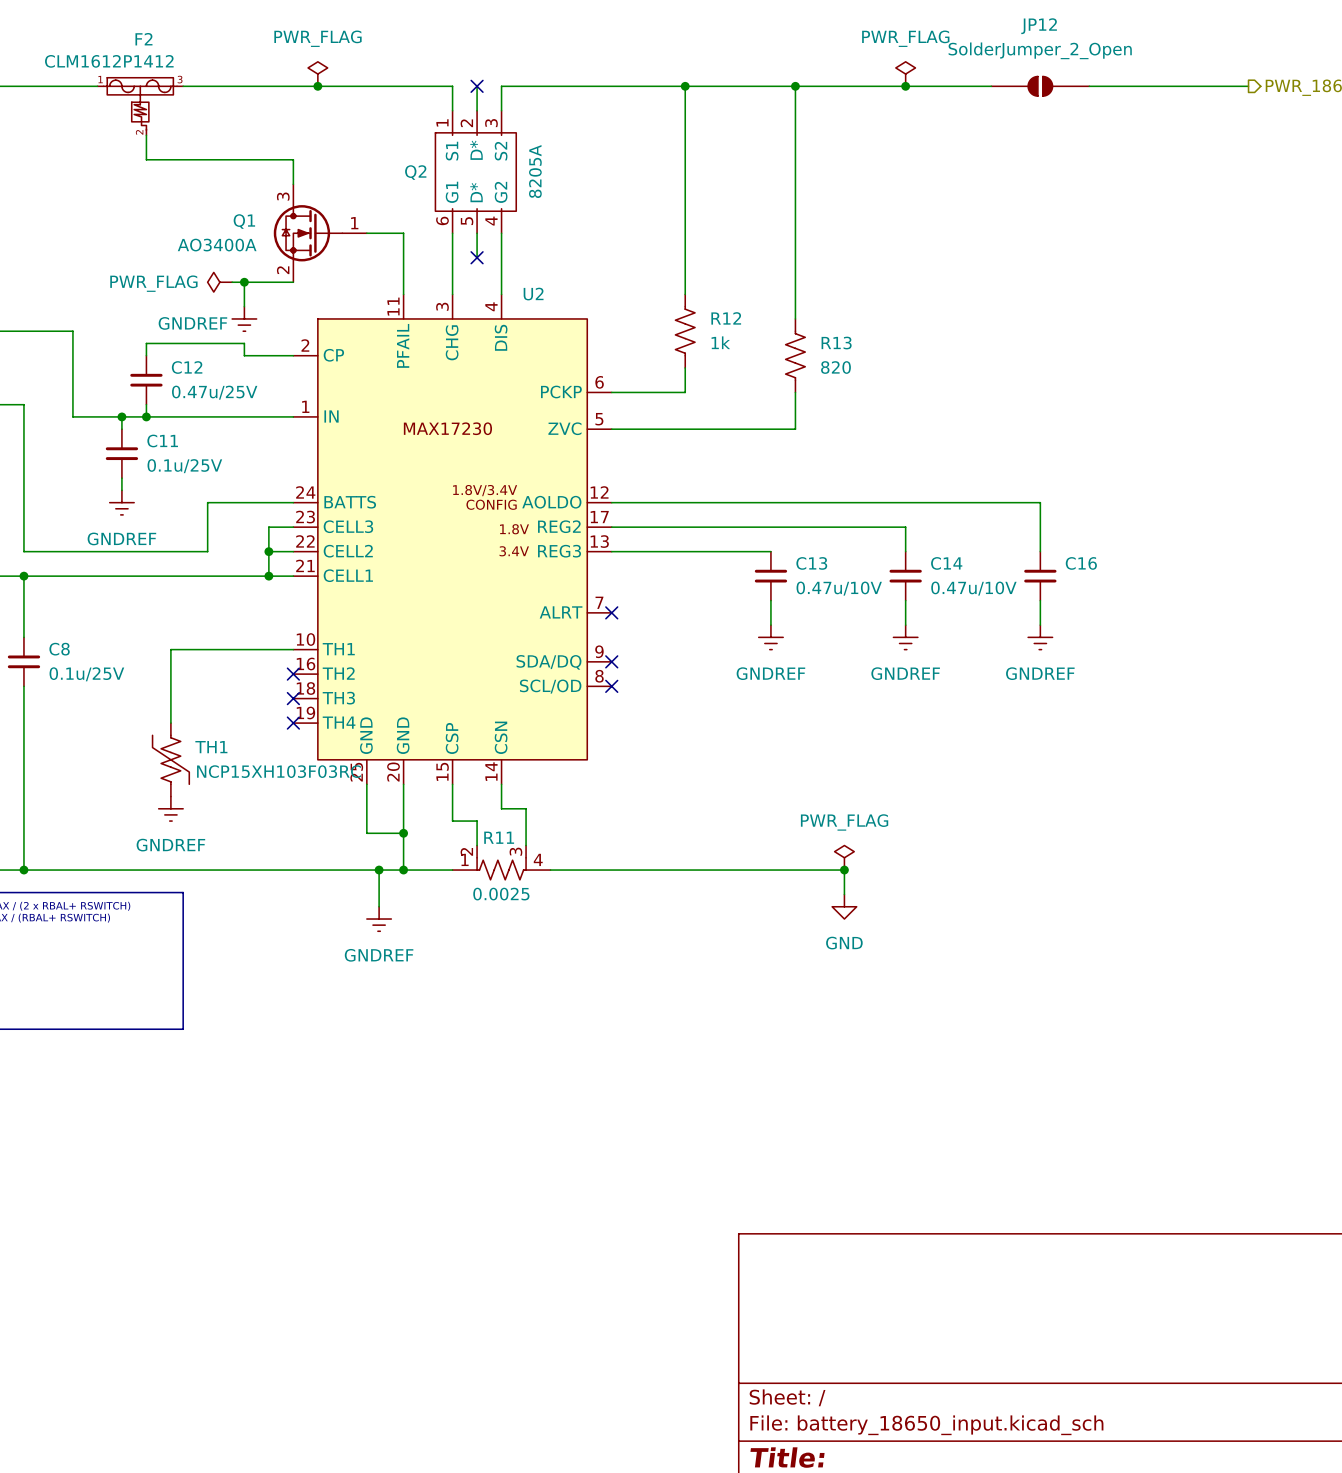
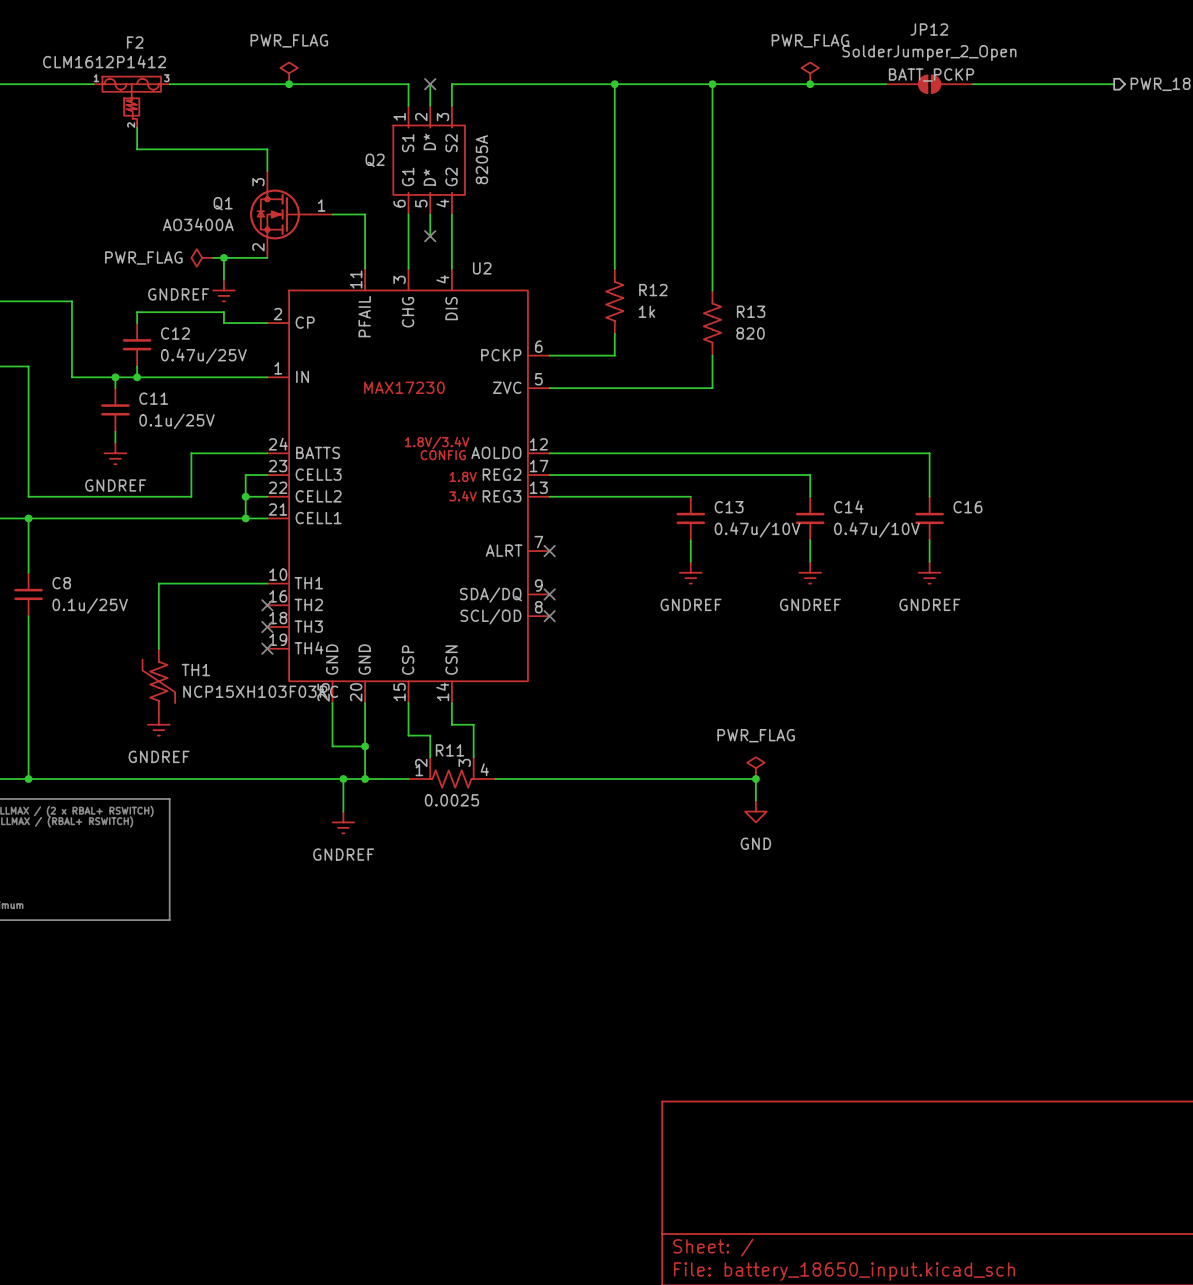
label: none -> BATT_PCKP (931, 75)

